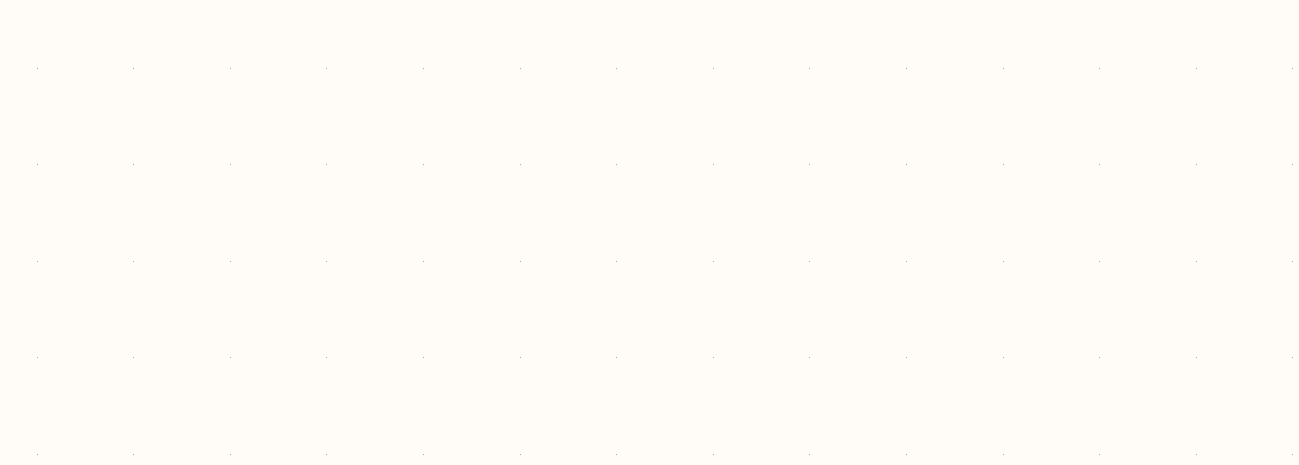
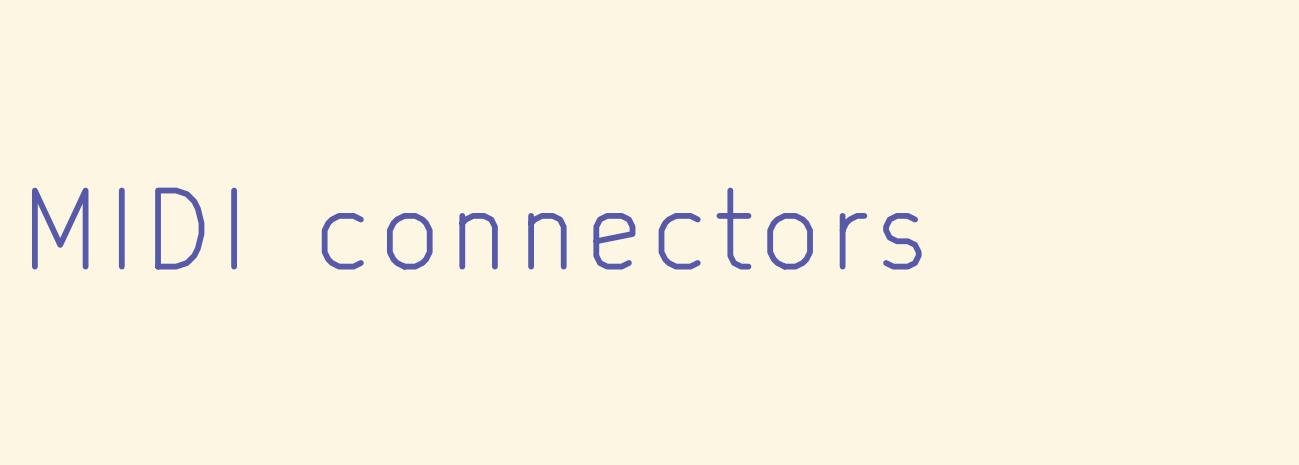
text: none -> MIDI connectors (476, 228)

